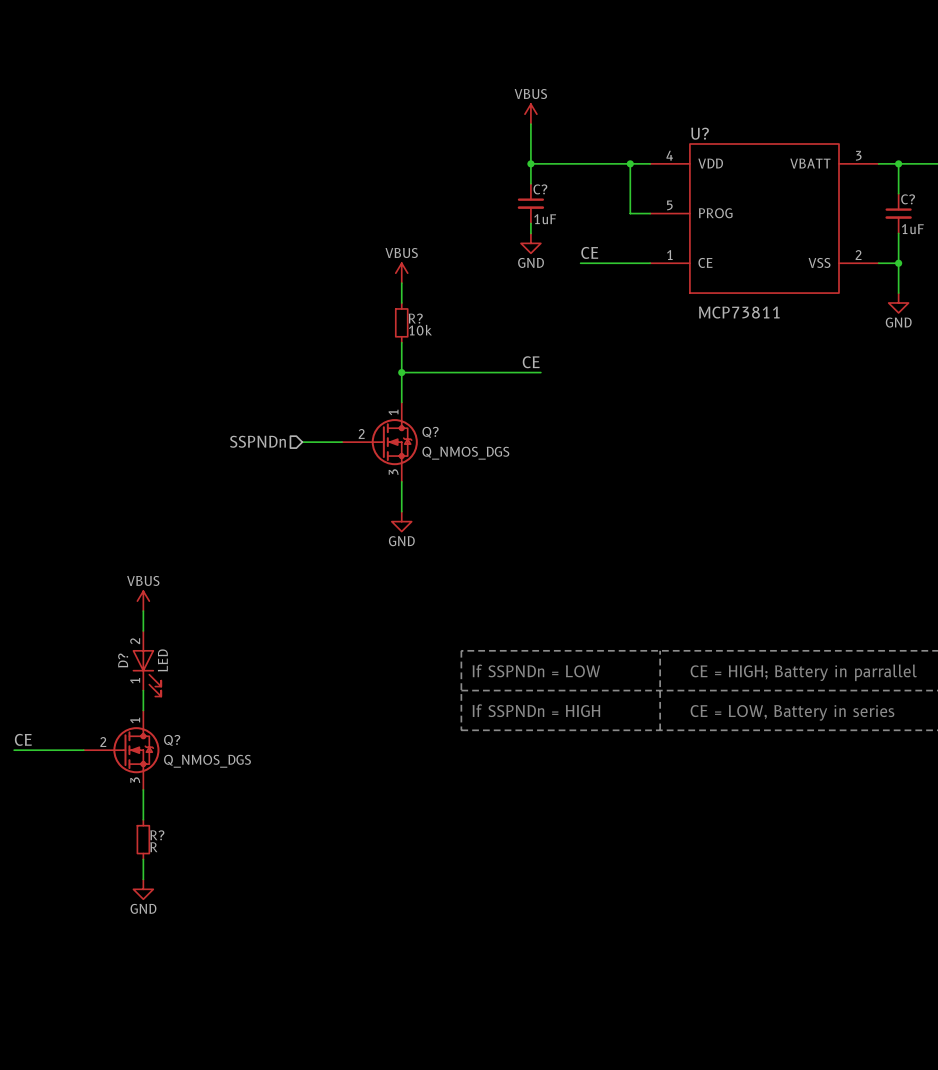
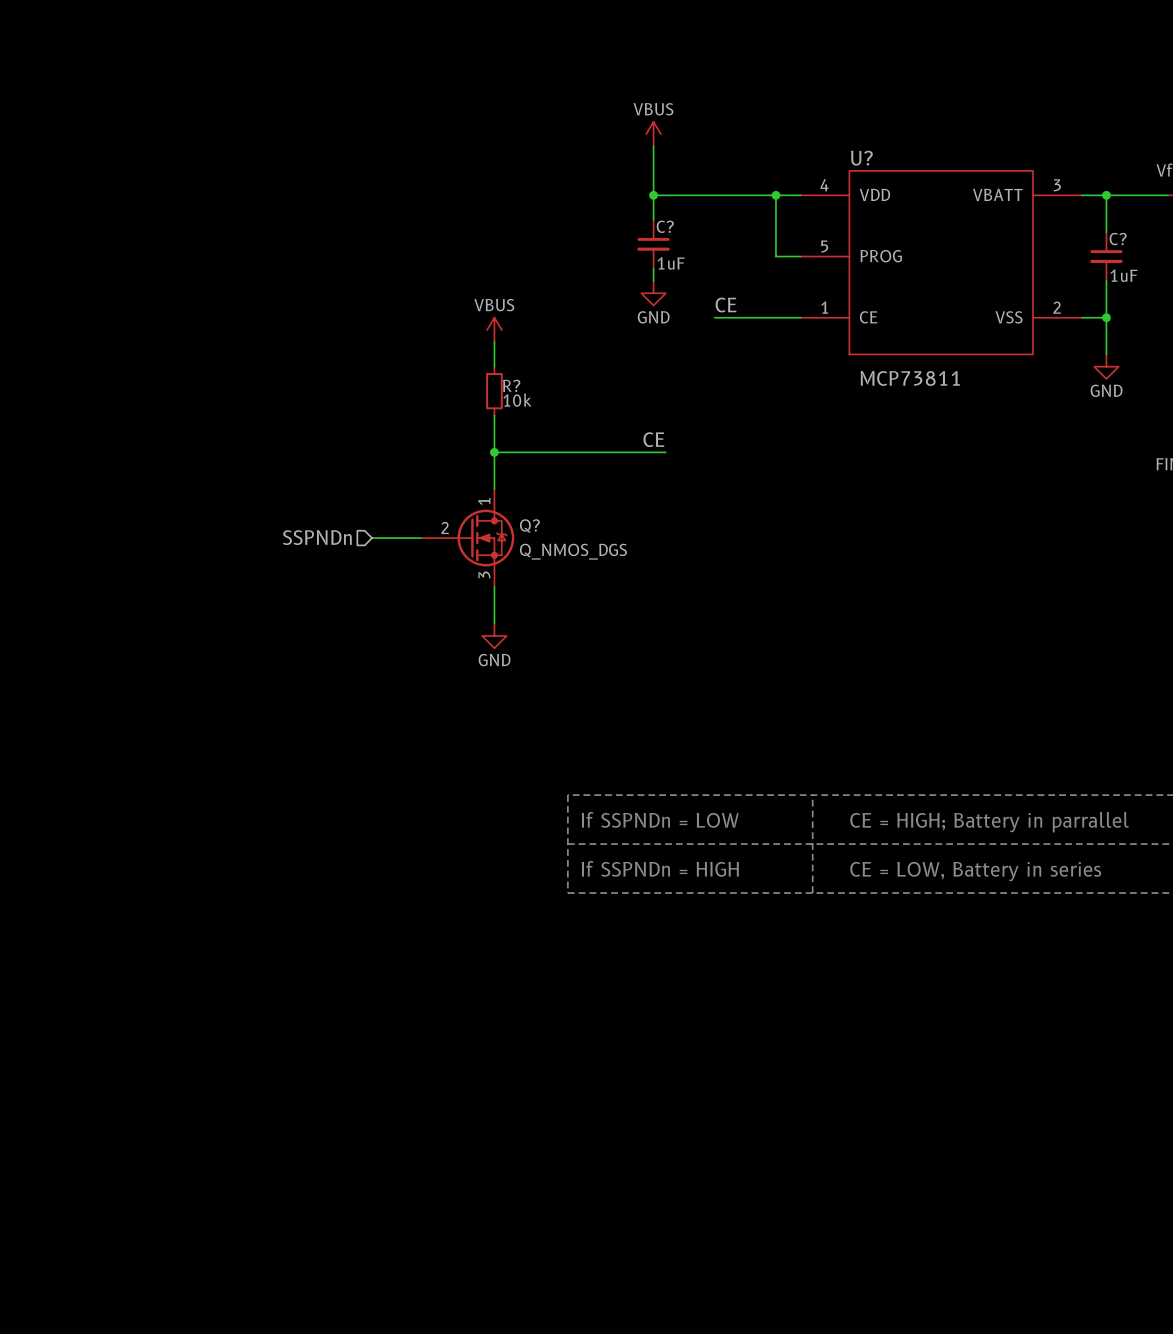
power symbol: VBUS (143, 601) -> none
wire: (143, 611) (143, 630) -> none
D?: LED (146, 663) -> none
wire: (143, 690) (143, 710) -> none
label: CE (23, 739) -> none
wire: (14, 750) (83, 750) -> none
Q?: Q_NMOS_DGS (121, 750) -> none
wire: (143, 789) (143, 819) -> none
R?: R (143, 839) -> none
wire: (143, 859) (143, 879) -> none
power symbol: GND (143, 889) -> none

